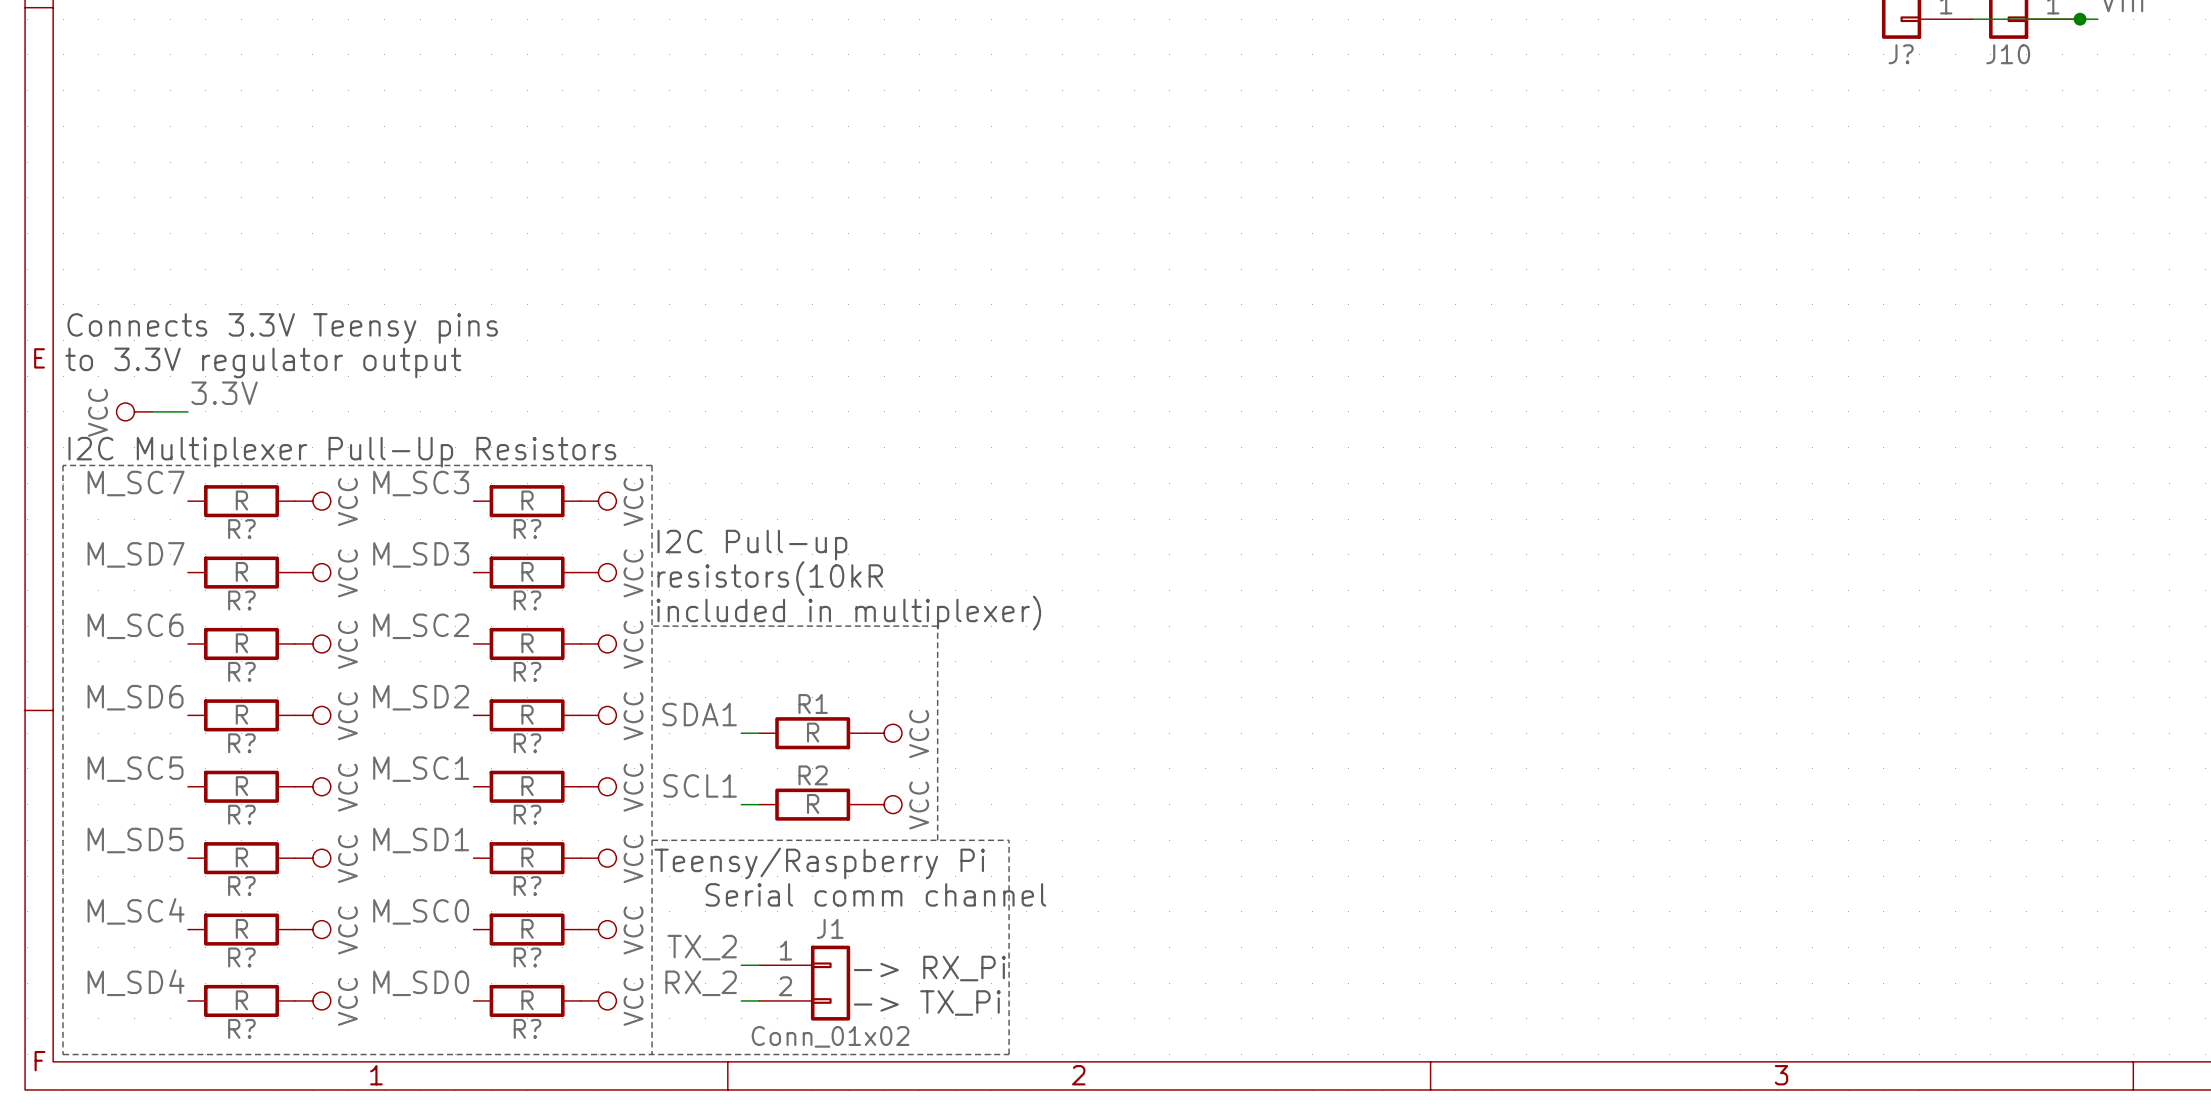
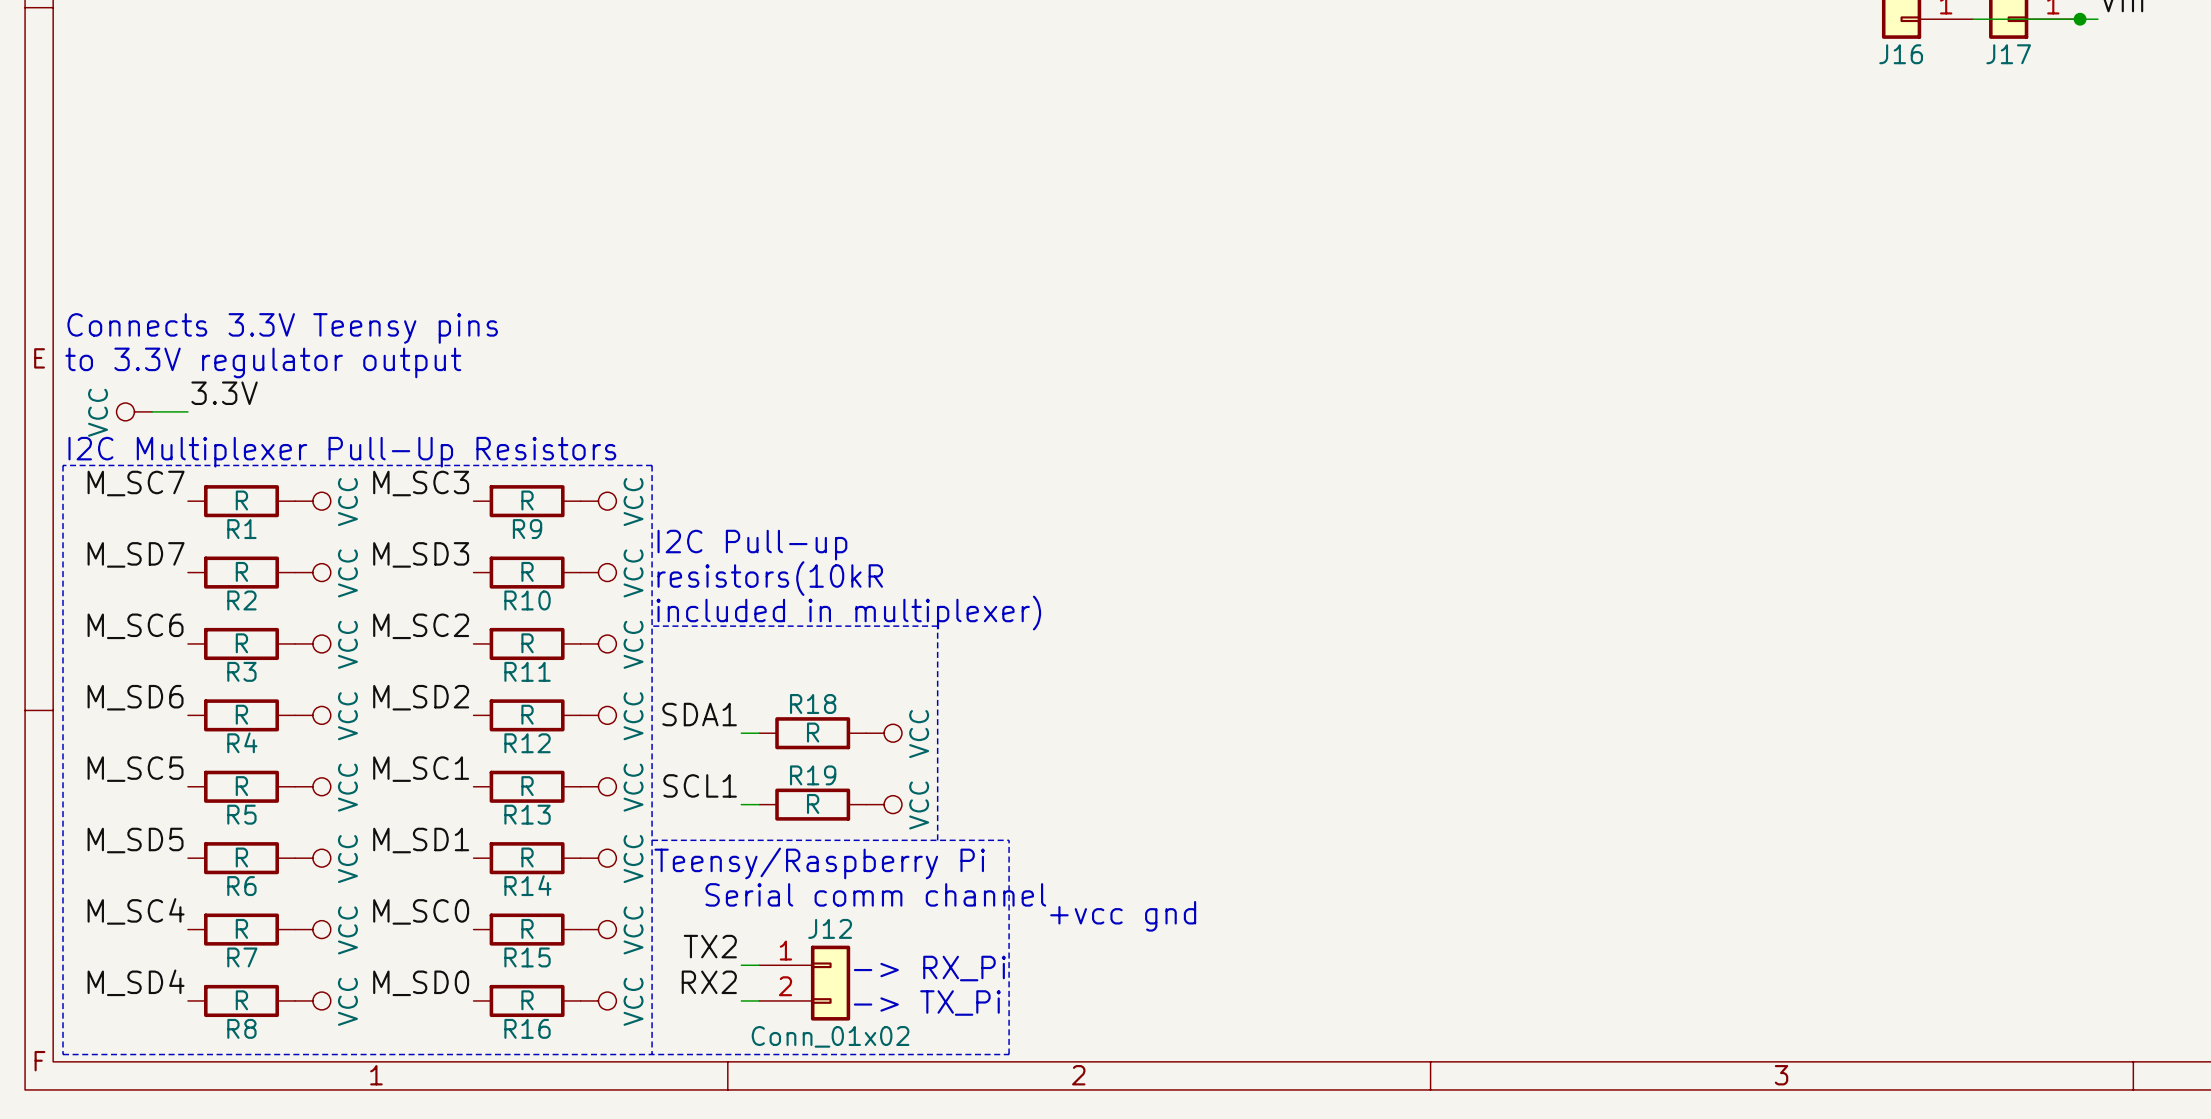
J? name: J? (1901, 54) -> J16 (1901, 54)
J10 name: J10 (2008, 54) -> J17 (2008, 54)
R? name: R? (241, 529) -> R1 (241, 529)
R? name: R? (527, 529) -> R9 (527, 529)
R? name: R? (241, 600) -> R2 (241, 600)
R? name: R? (527, 600) -> R10 (527, 600)
R? name: R? (241, 671) -> R3 (241, 671)
R? name: R? (527, 671) -> R11 (527, 671)
R1 name: R1 (813, 703) -> R18 (813, 703)
R? name: R? (241, 743) -> R4 (242, 742)
R? name: R? (527, 743) -> R12 (527, 743)
R2 name: R2 (813, 775) -> R19 (813, 775)
R? name: R? (241, 814) -> R5 (241, 814)
R? name: R? (527, 814) -> R13 (527, 814)
R? name: R? (241, 886) -> R6 (241, 886)
R? name: R? (527, 886) -> R14 (527, 885)
text: none -> +vcc gnd (1123, 916)
J1 name: J1 (830, 928) -> J12 (830, 928)
label: TX_2 (702, 947) -> TX2 (710, 946)
R? name: R? (241, 957) -> R7 (242, 957)
R? name: R? (527, 957) -> R15 (527, 957)
label: RX_2 (701, 983) -> RX2 (709, 982)
R? name: R? (241, 1028) -> R8 (241, 1028)
R? name: R? (527, 1028) -> R16 (527, 1028)

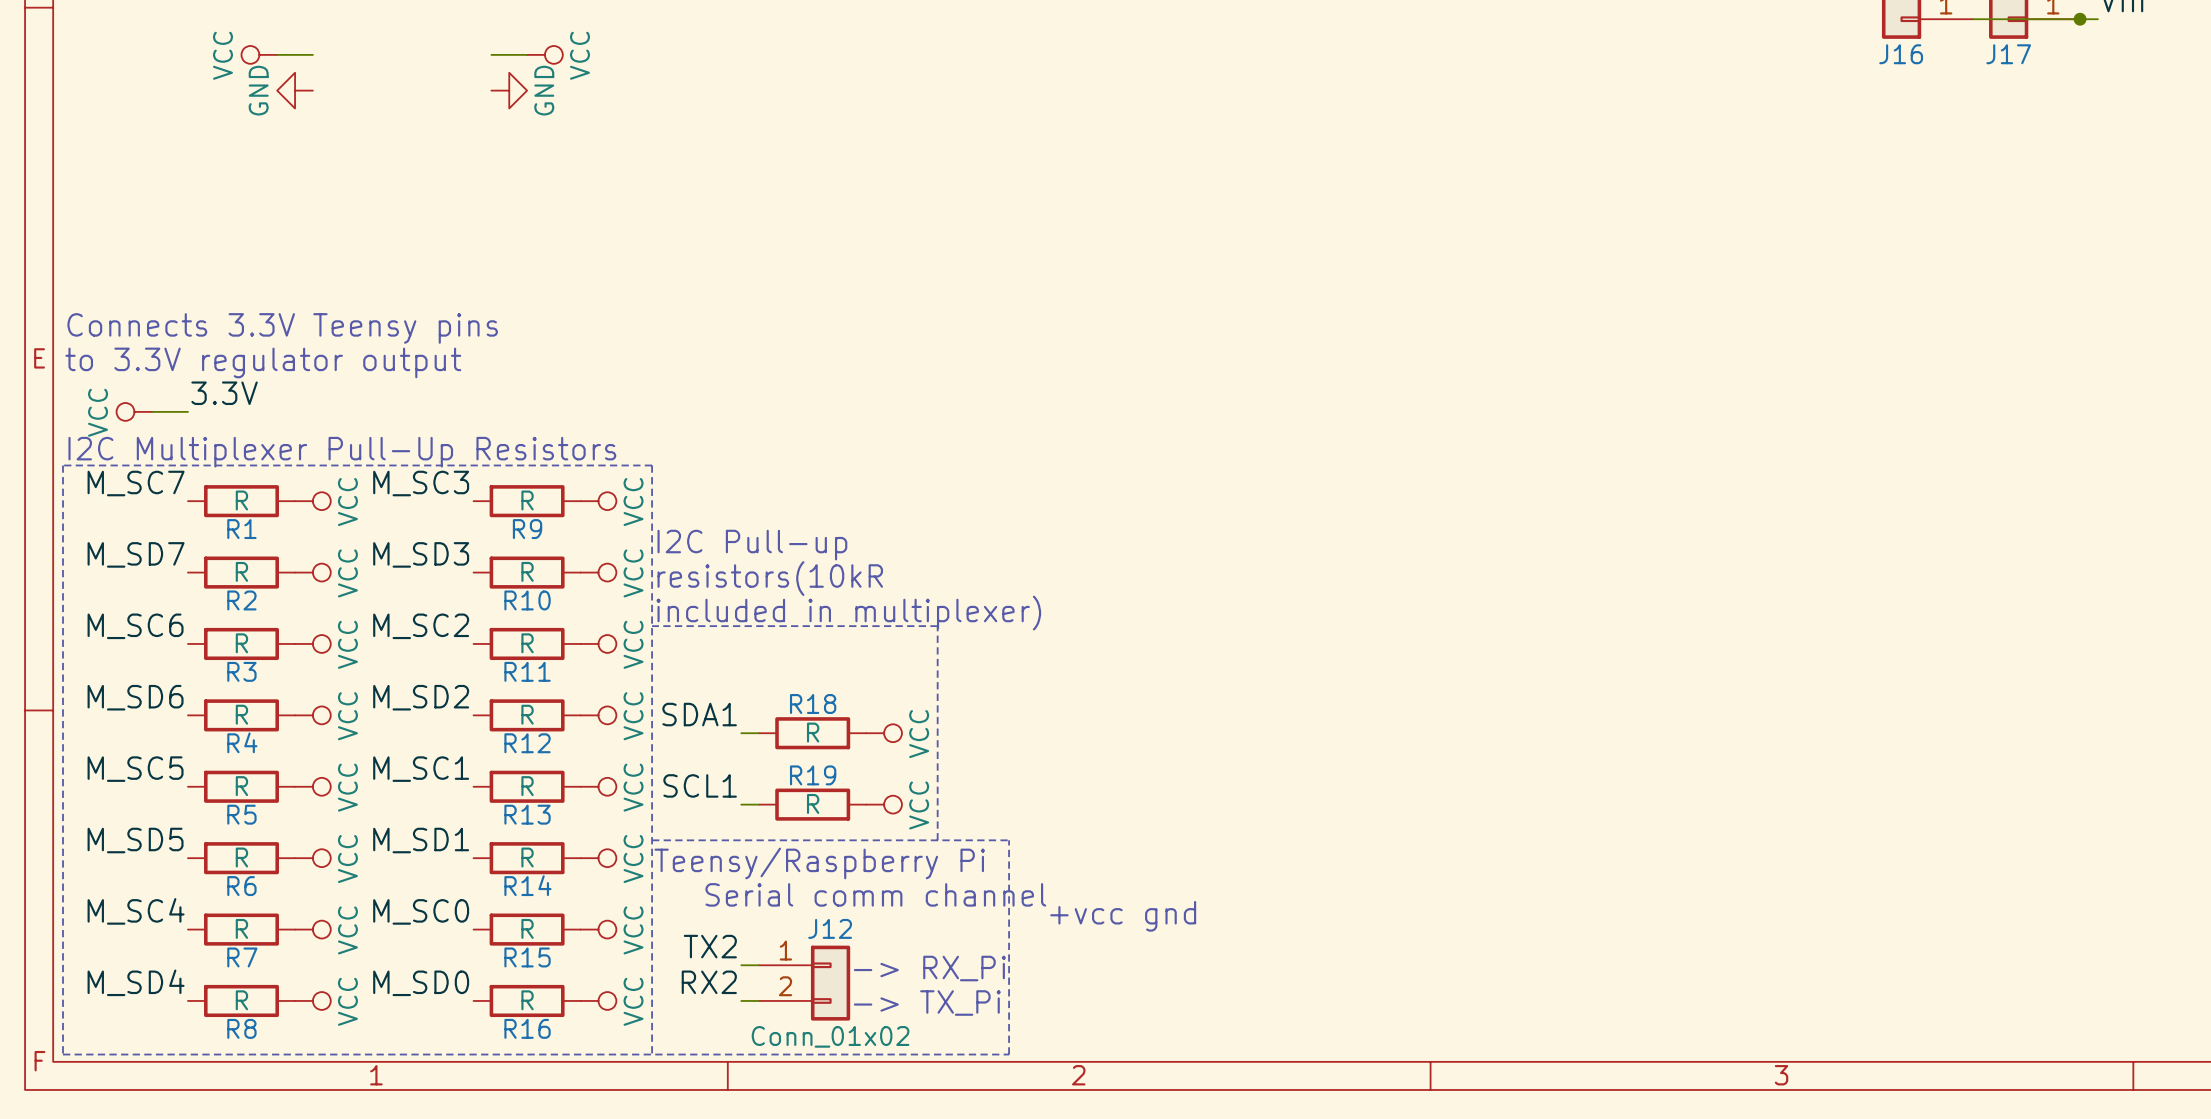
power symbol: none -> VCC (259, 54)
wire: none -> (277, 54) (312, 54)
wire: none -> (491, 54) (527, 54)
power symbol: none -> VCC (544, 54)
power symbol: none -> GND (295, 90)
power symbol: none -> GND (509, 90)

